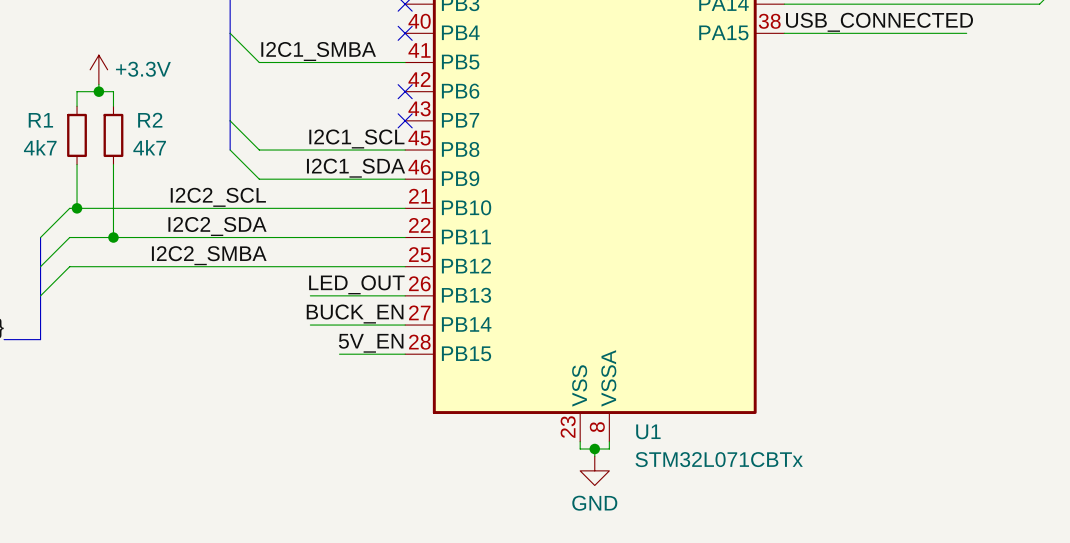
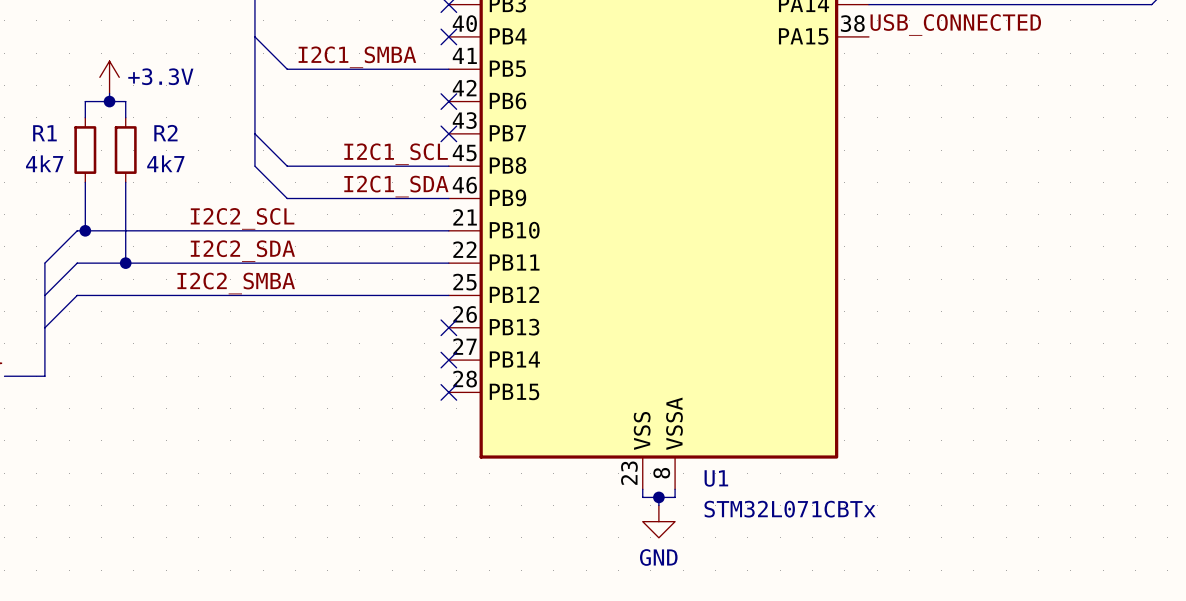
wire: (784, 33) (966, 33) -> none
label: LED_OUT (356, 284) -> none
wire: (310, 295) (405, 295) -> none
no-connect mark: none -> (448, 327)
label: BUCK_EN (355, 314) -> none
wire: (310, 325) (405, 325) -> none
no-connect mark: none -> (448, 360)
label: 5V_EN (371, 343) -> none
wire: (339, 354) (405, 354) -> none
no-connect mark: none -> (448, 392)

